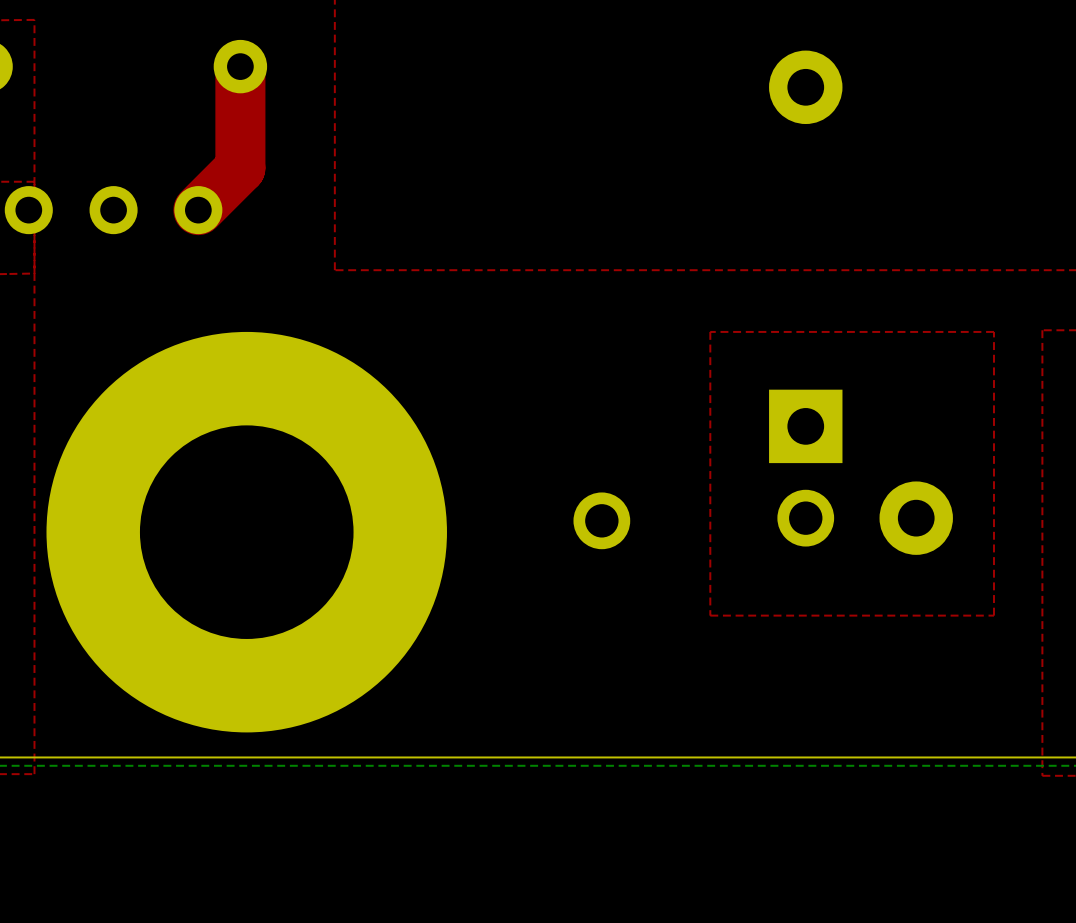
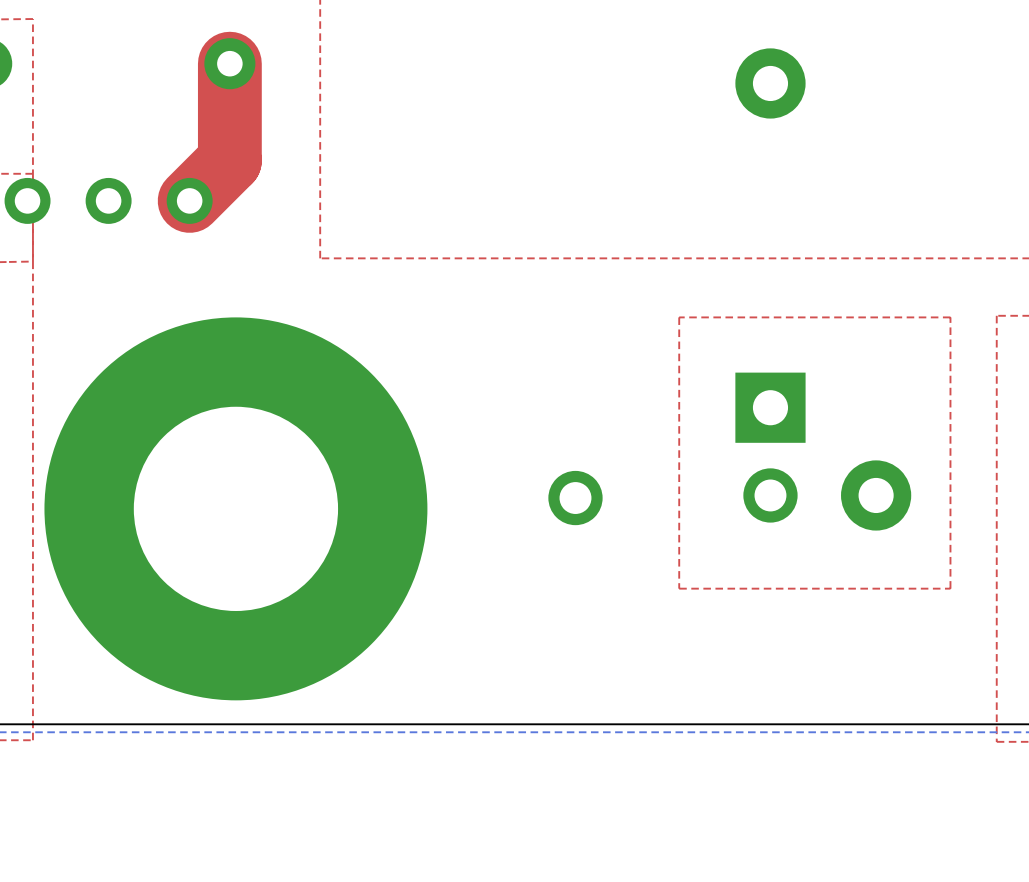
top track width: thin (240, 66) (240, 168) (198, 210) -> thick (229, 63) (229, 160) (189, 200)

